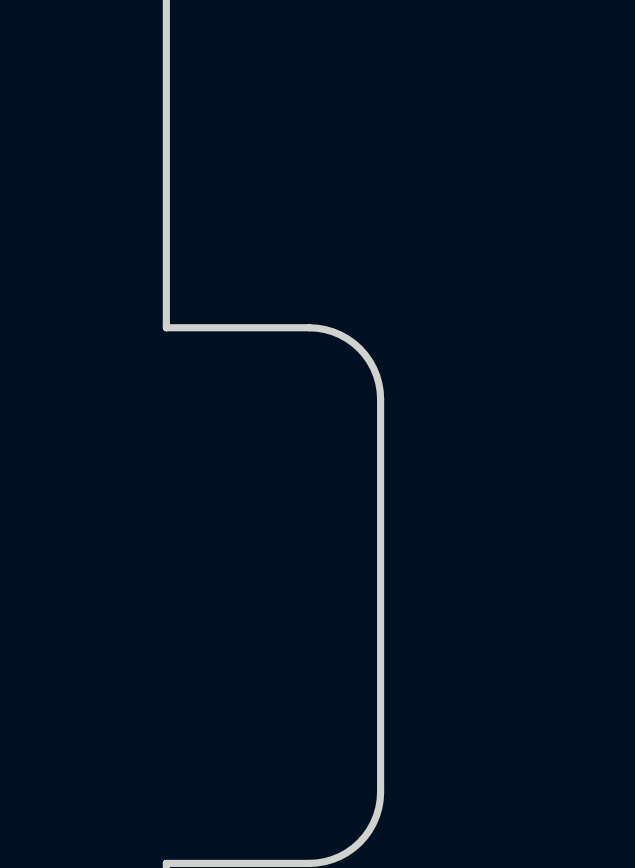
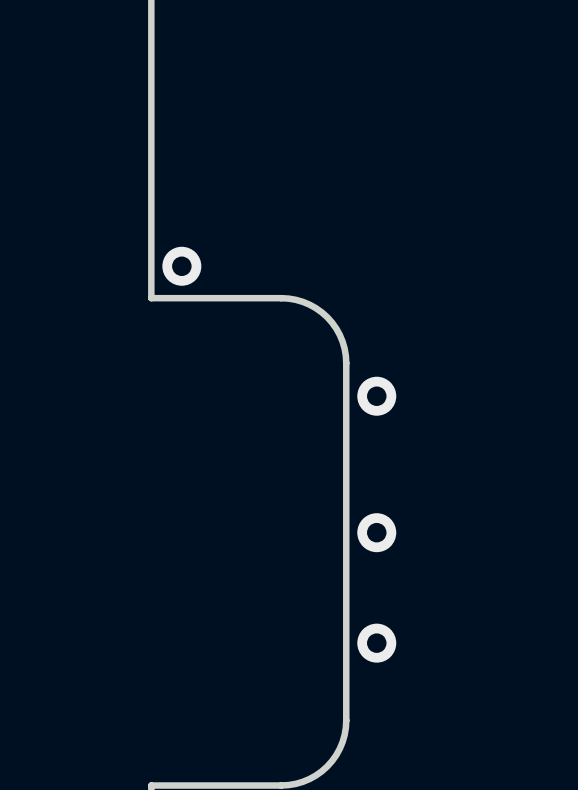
via: none -> (181, 266)
via: none -> (376, 396)
via: none -> (376, 532)
via: none -> (376, 643)

